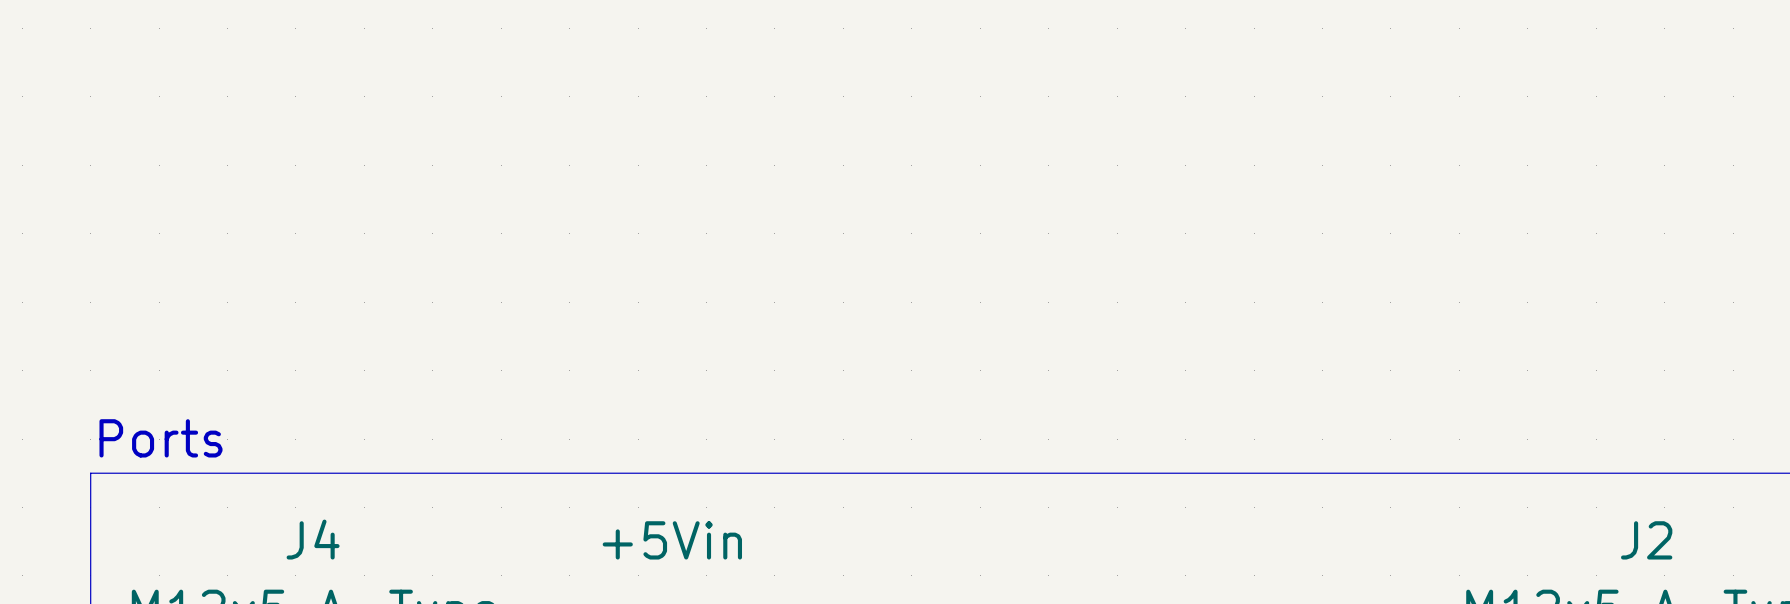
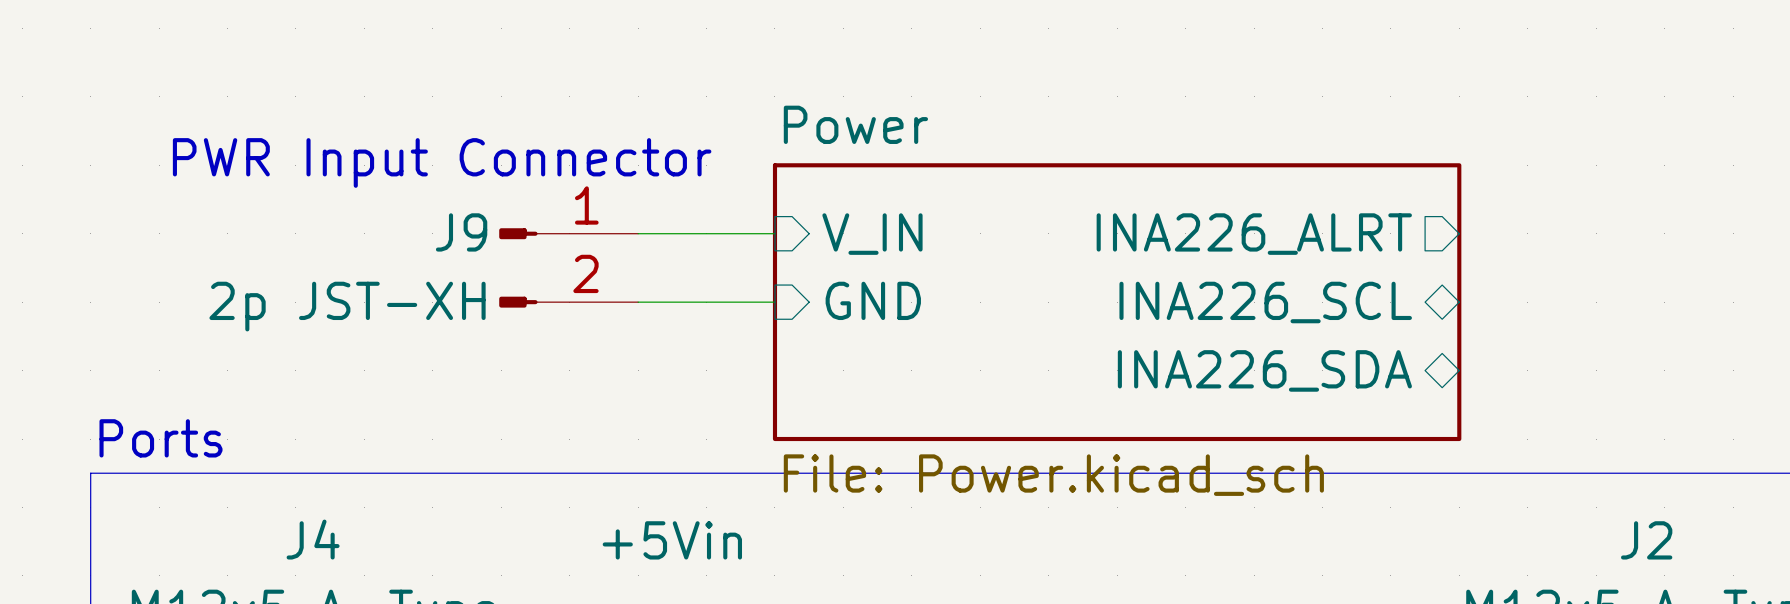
text: none -> PWR Input Connector (442, 162)
wire: none -> (638, 233) (774, 233)
sheet pin: none -> V_IN (872, 234)
sheet pin: none -> INA226_ALRT (1254, 234)
J9: none -> 2p JST-XH (568, 267)
sheet pin: none -> GND (873, 300)
wire: none -> (638, 302) (774, 302)
sheet Power: none -> File: Power.kicad_sch (1117, 302)
sheet pin: none -> INA226_SCL (1265, 302)
sheet pin: none -> INA226_SDA (1264, 370)

